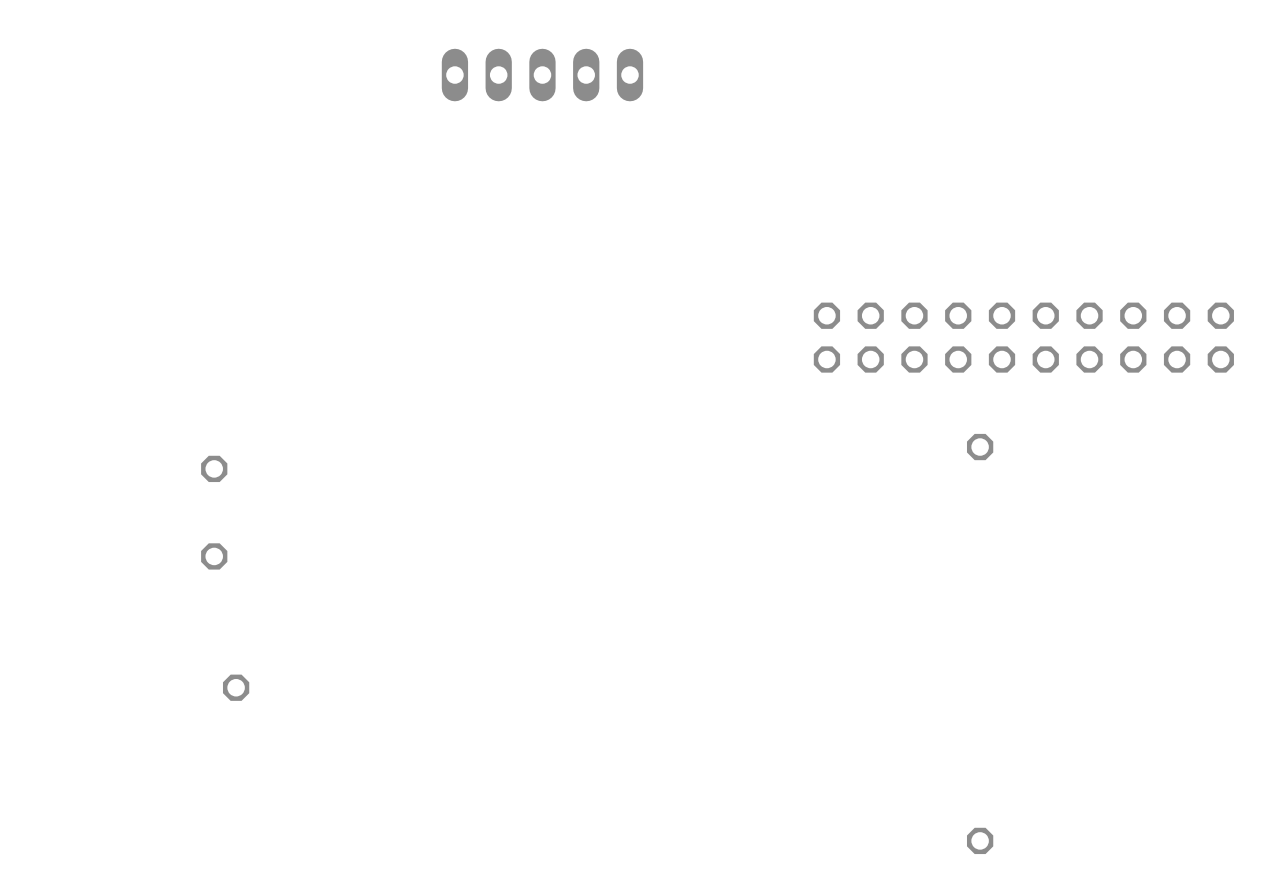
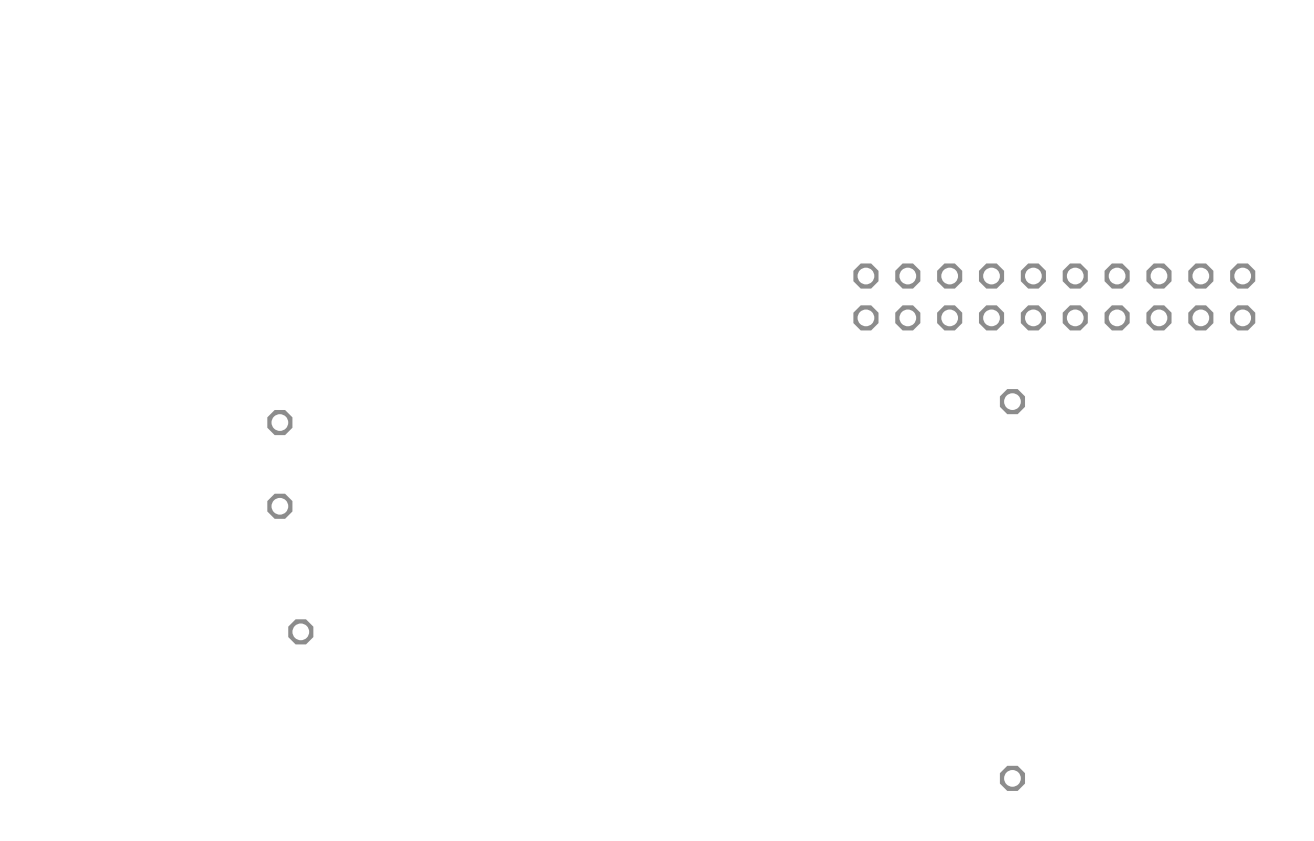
part: (542, 75) -> none

